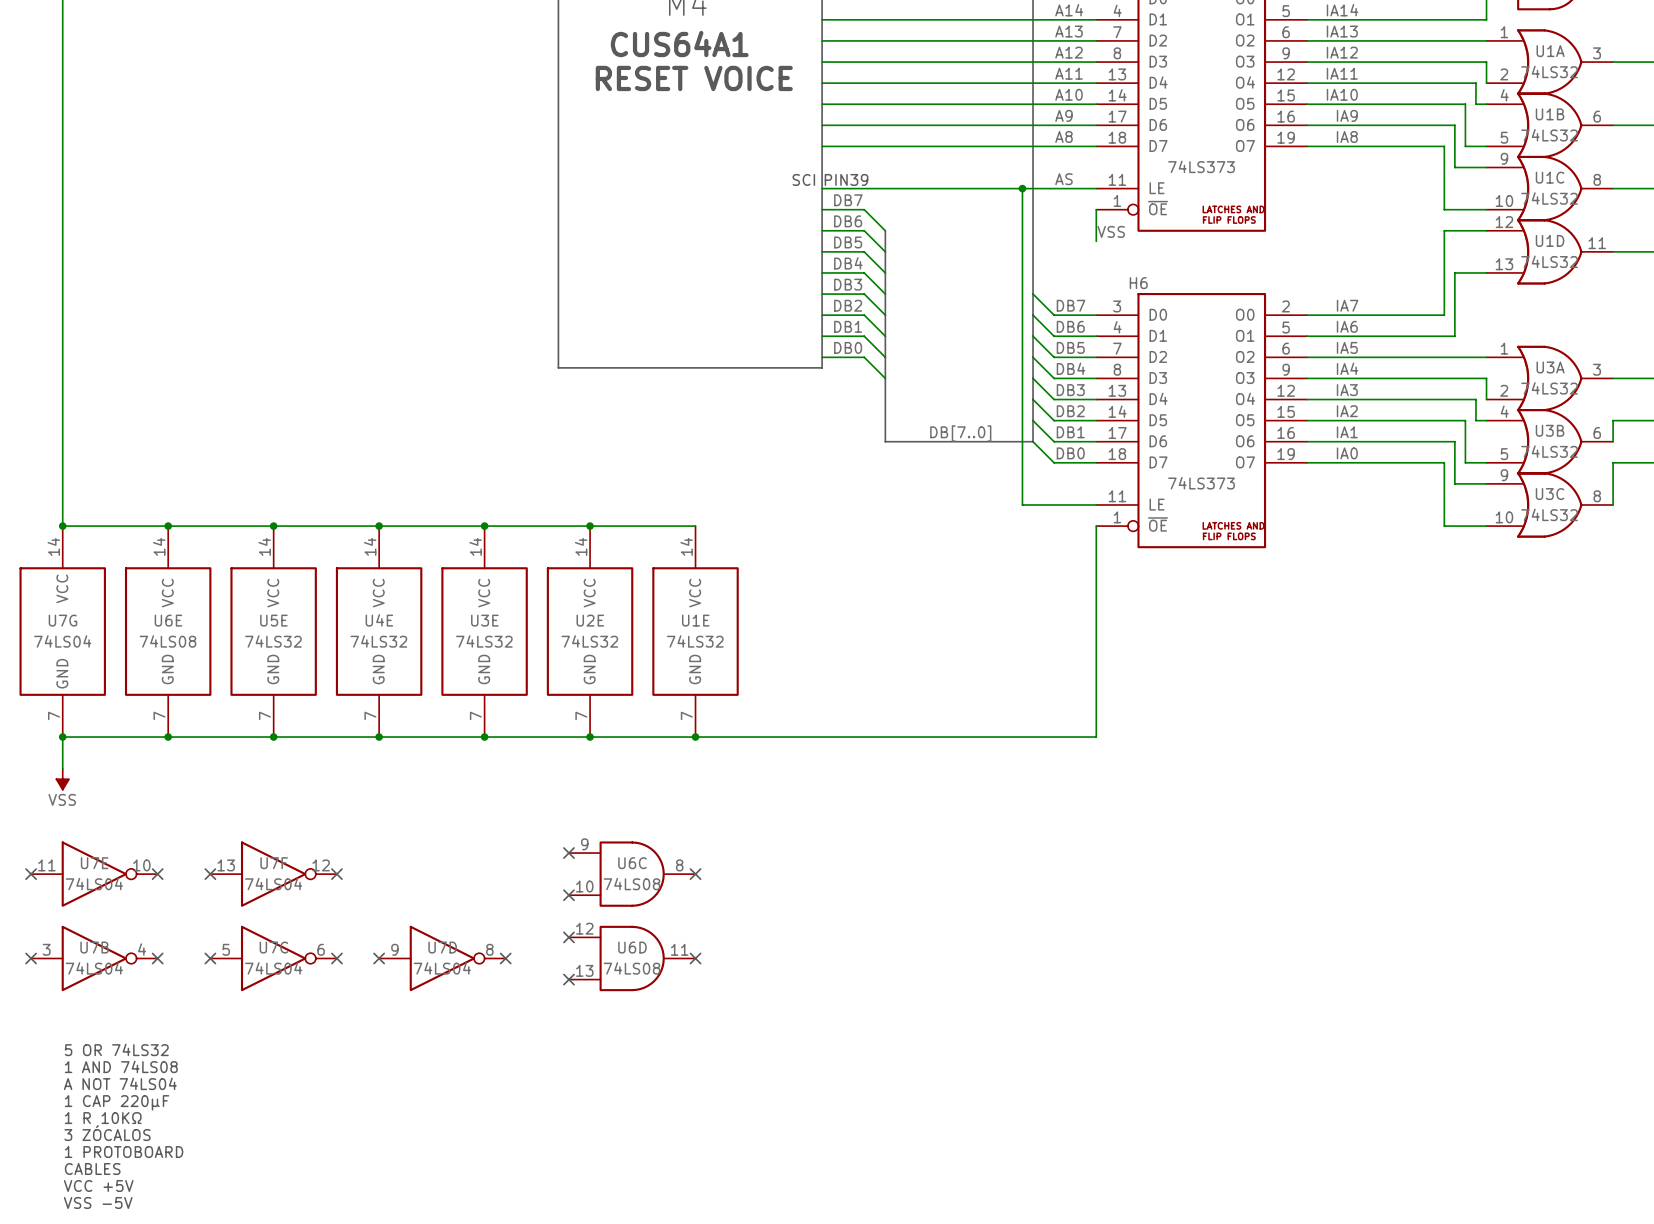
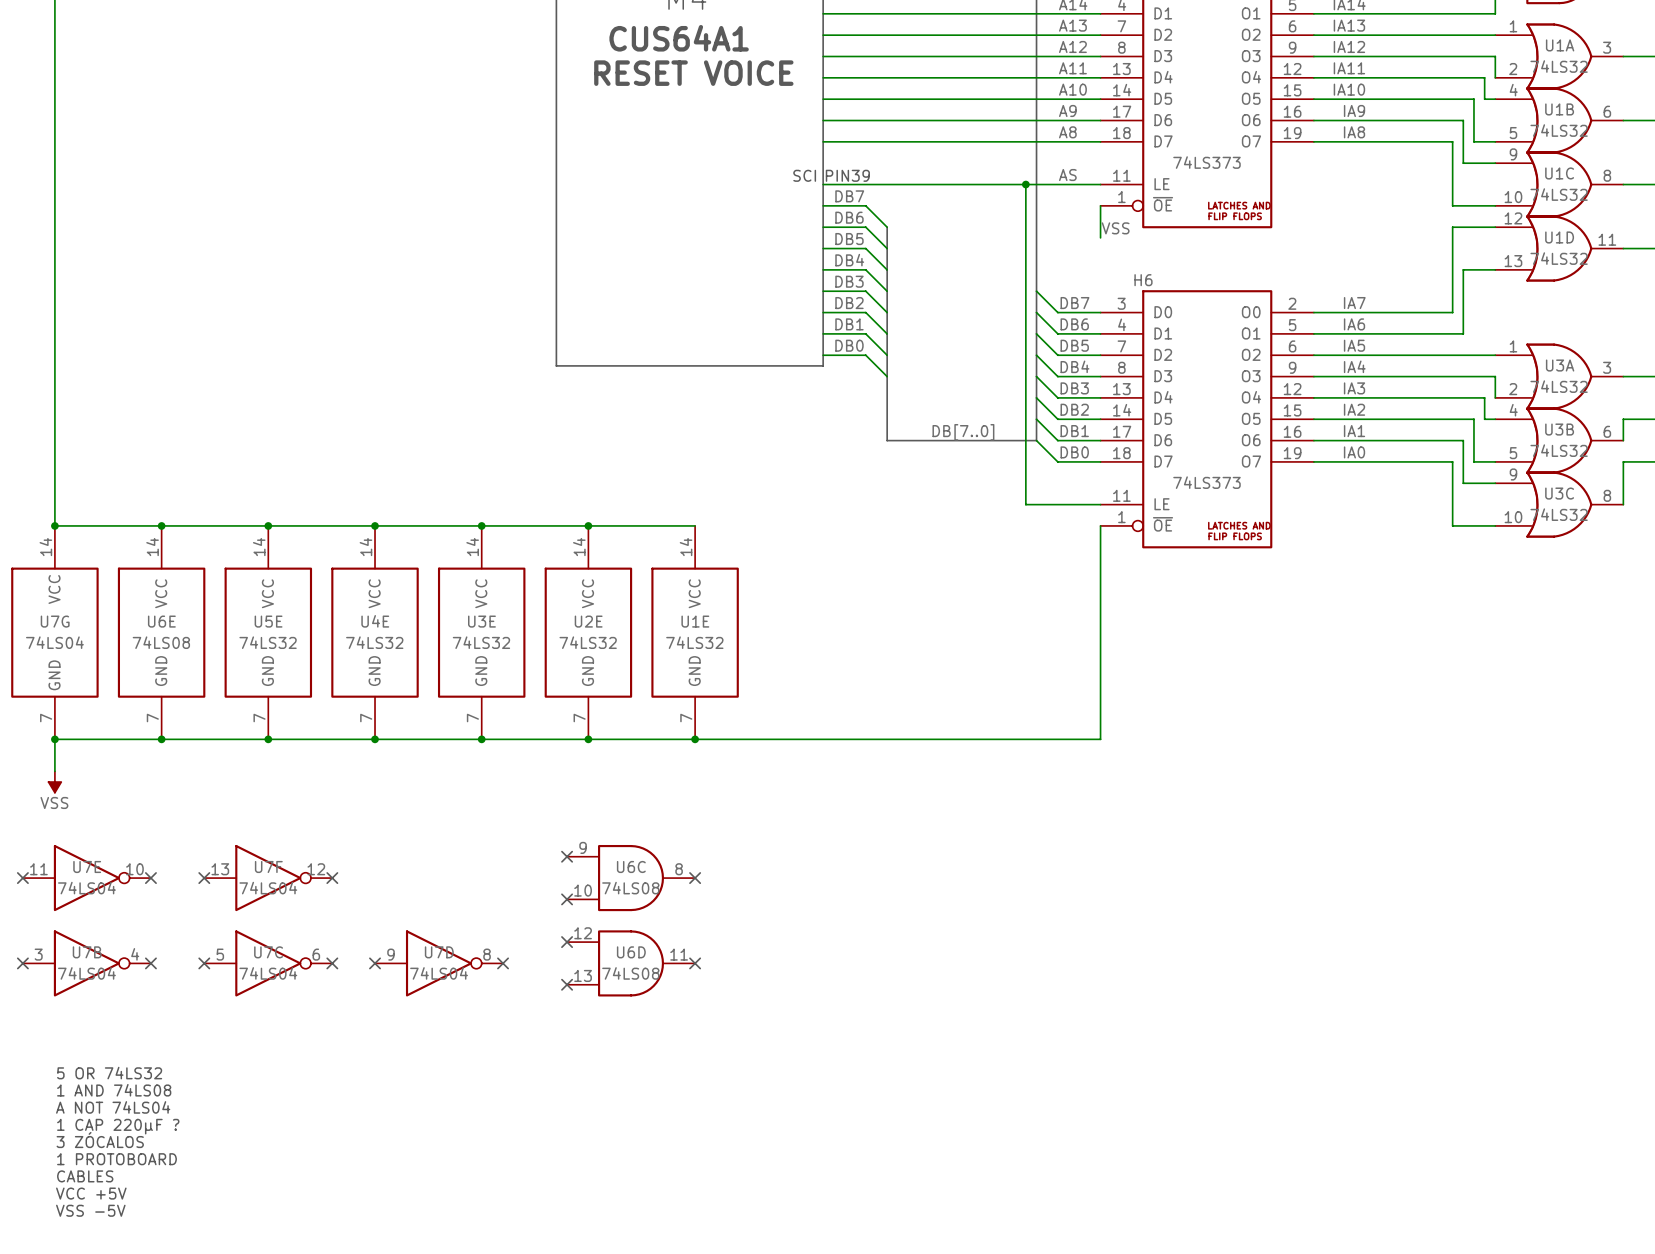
text: 5 OR 74LS32 (116, 1049) -> none
text: 1 AND 74LS08 (121, 1066) -> 5 OR 74LS32 (109, 1073)
text: A NOT 74LS04 (120, 1083) -> 1 AND 74LS08 (114, 1090)
text: 1 CAP 220µF (117, 1102) -> A NOT 74LS04 (113, 1107)
text: 1 R 10KΩ (103, 1118) -> 1 CAP 220µF ? (118, 1126)

